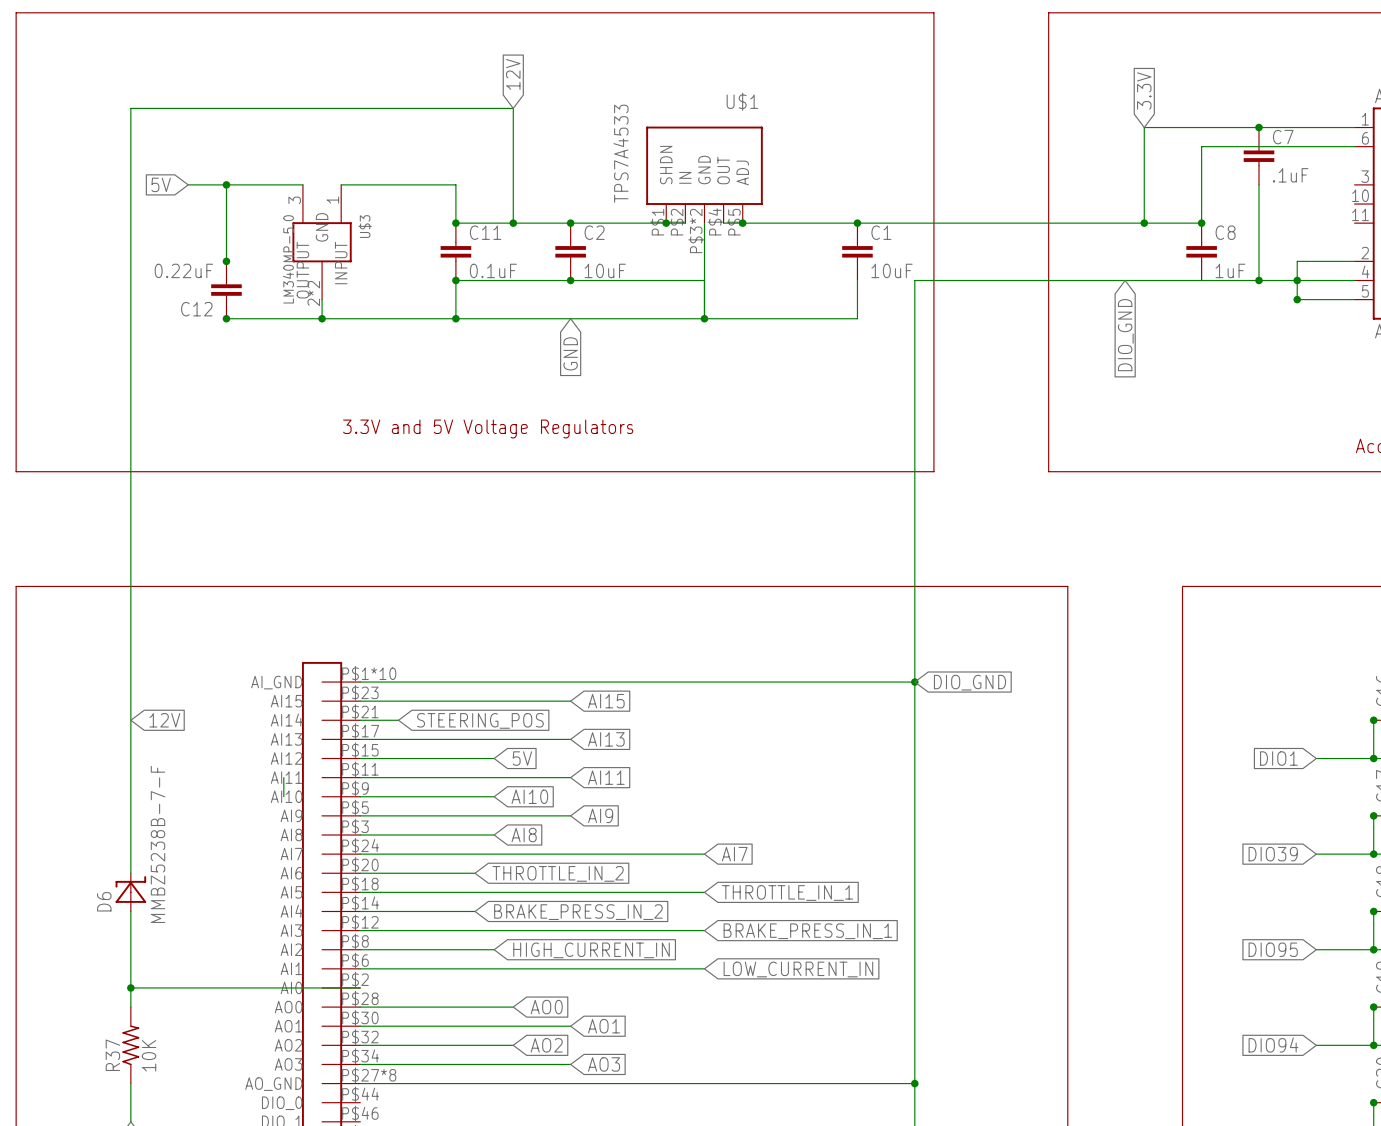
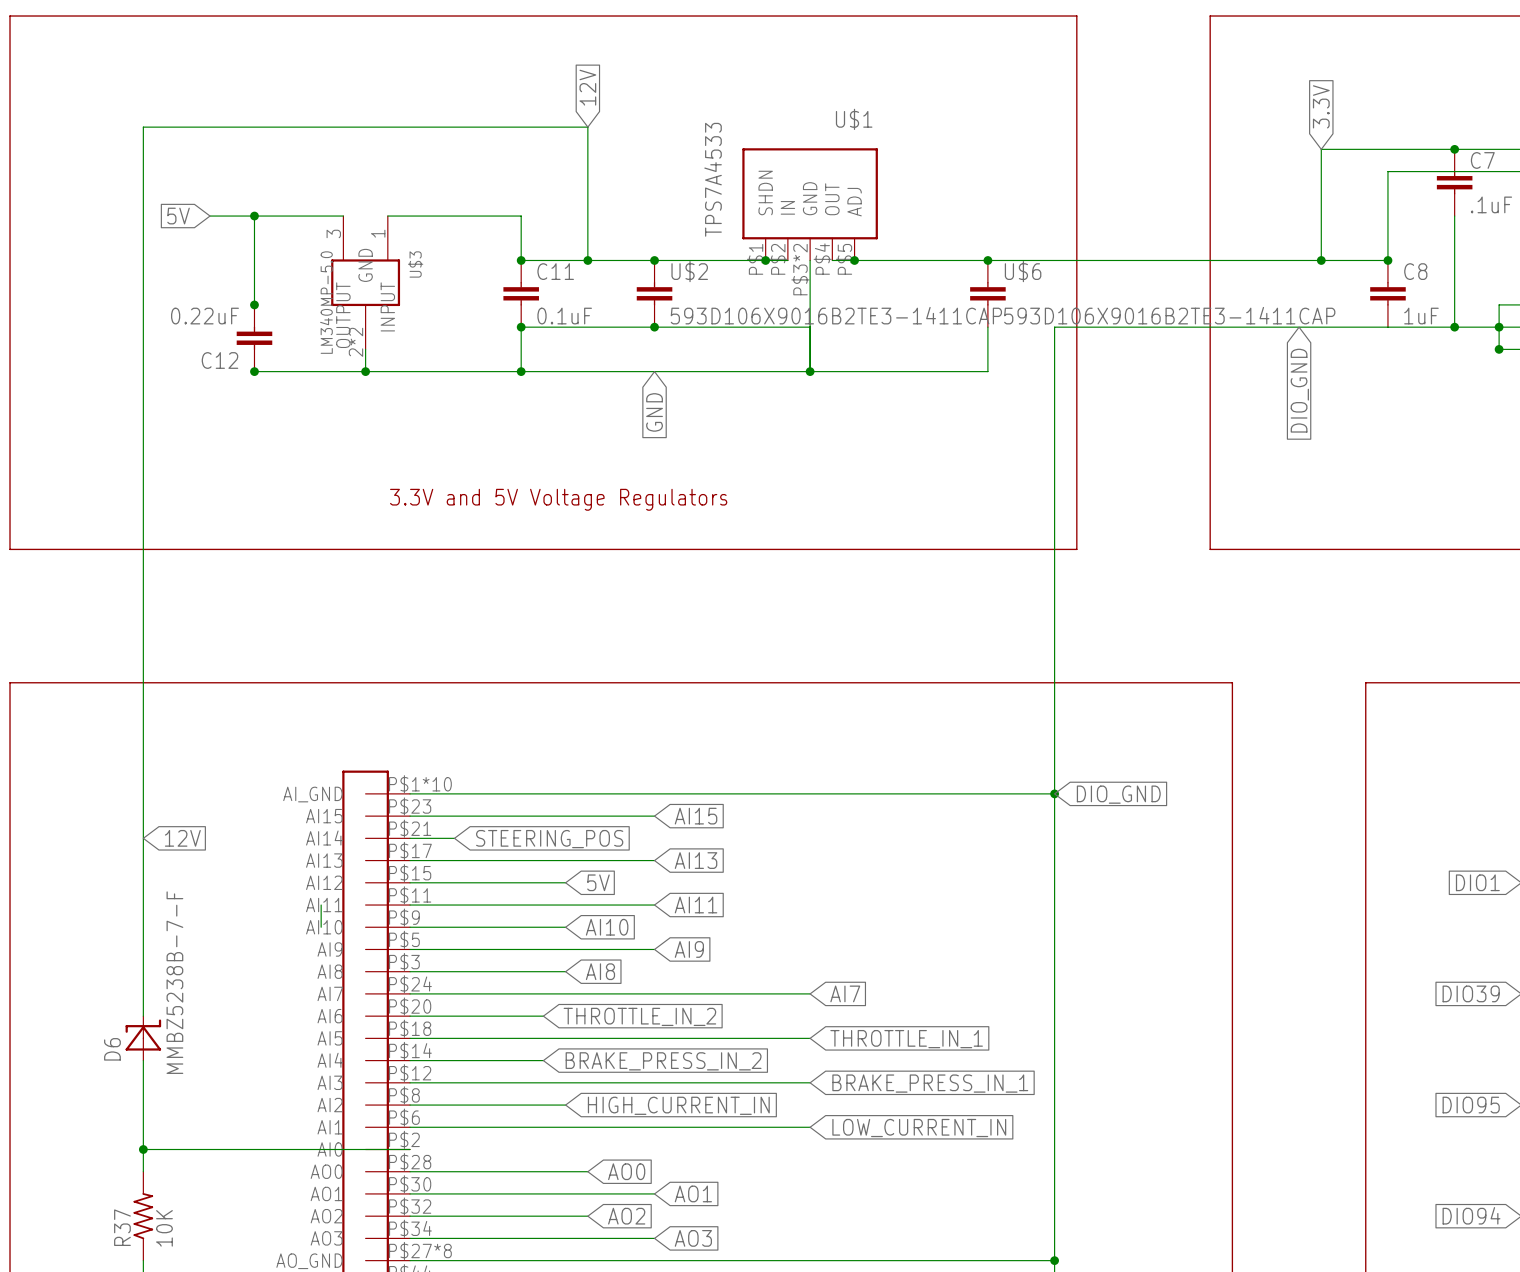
C2 name: C2 (594, 232) -> U$2 (689, 271)
C1 name: C1 (881, 232) -> U$6 (1023, 271)
C2 value: 10uF (605, 270) -> 593D106X9016B2TE3-1411CAP (836, 315)
C1 value: 10uF (892, 270) -> 593D106X9016B2TE3-1411CAP (1169, 315)

